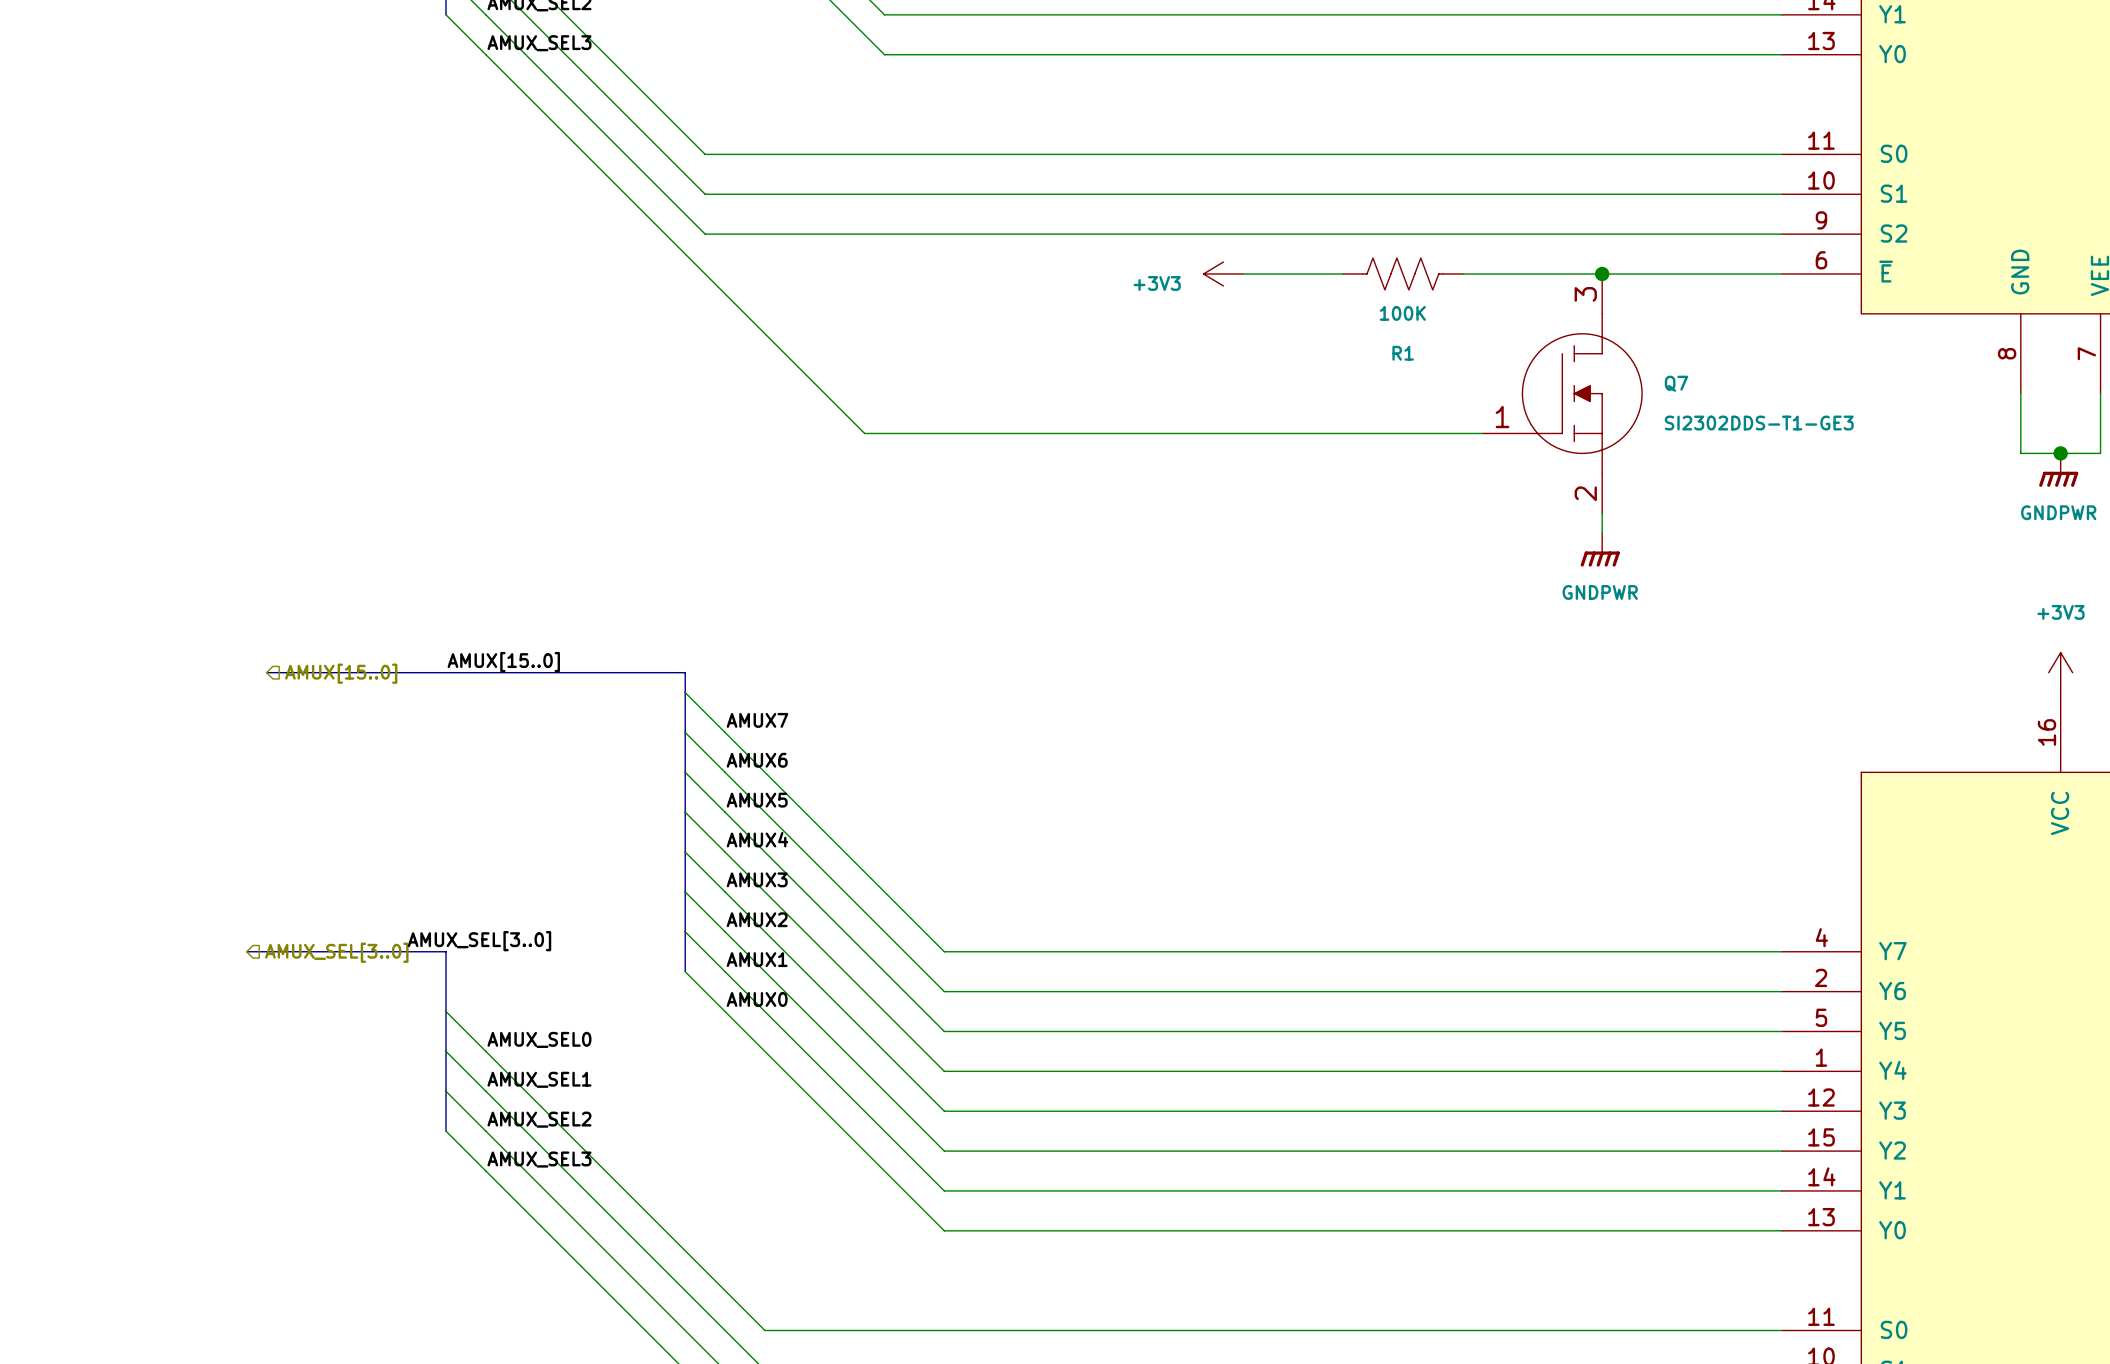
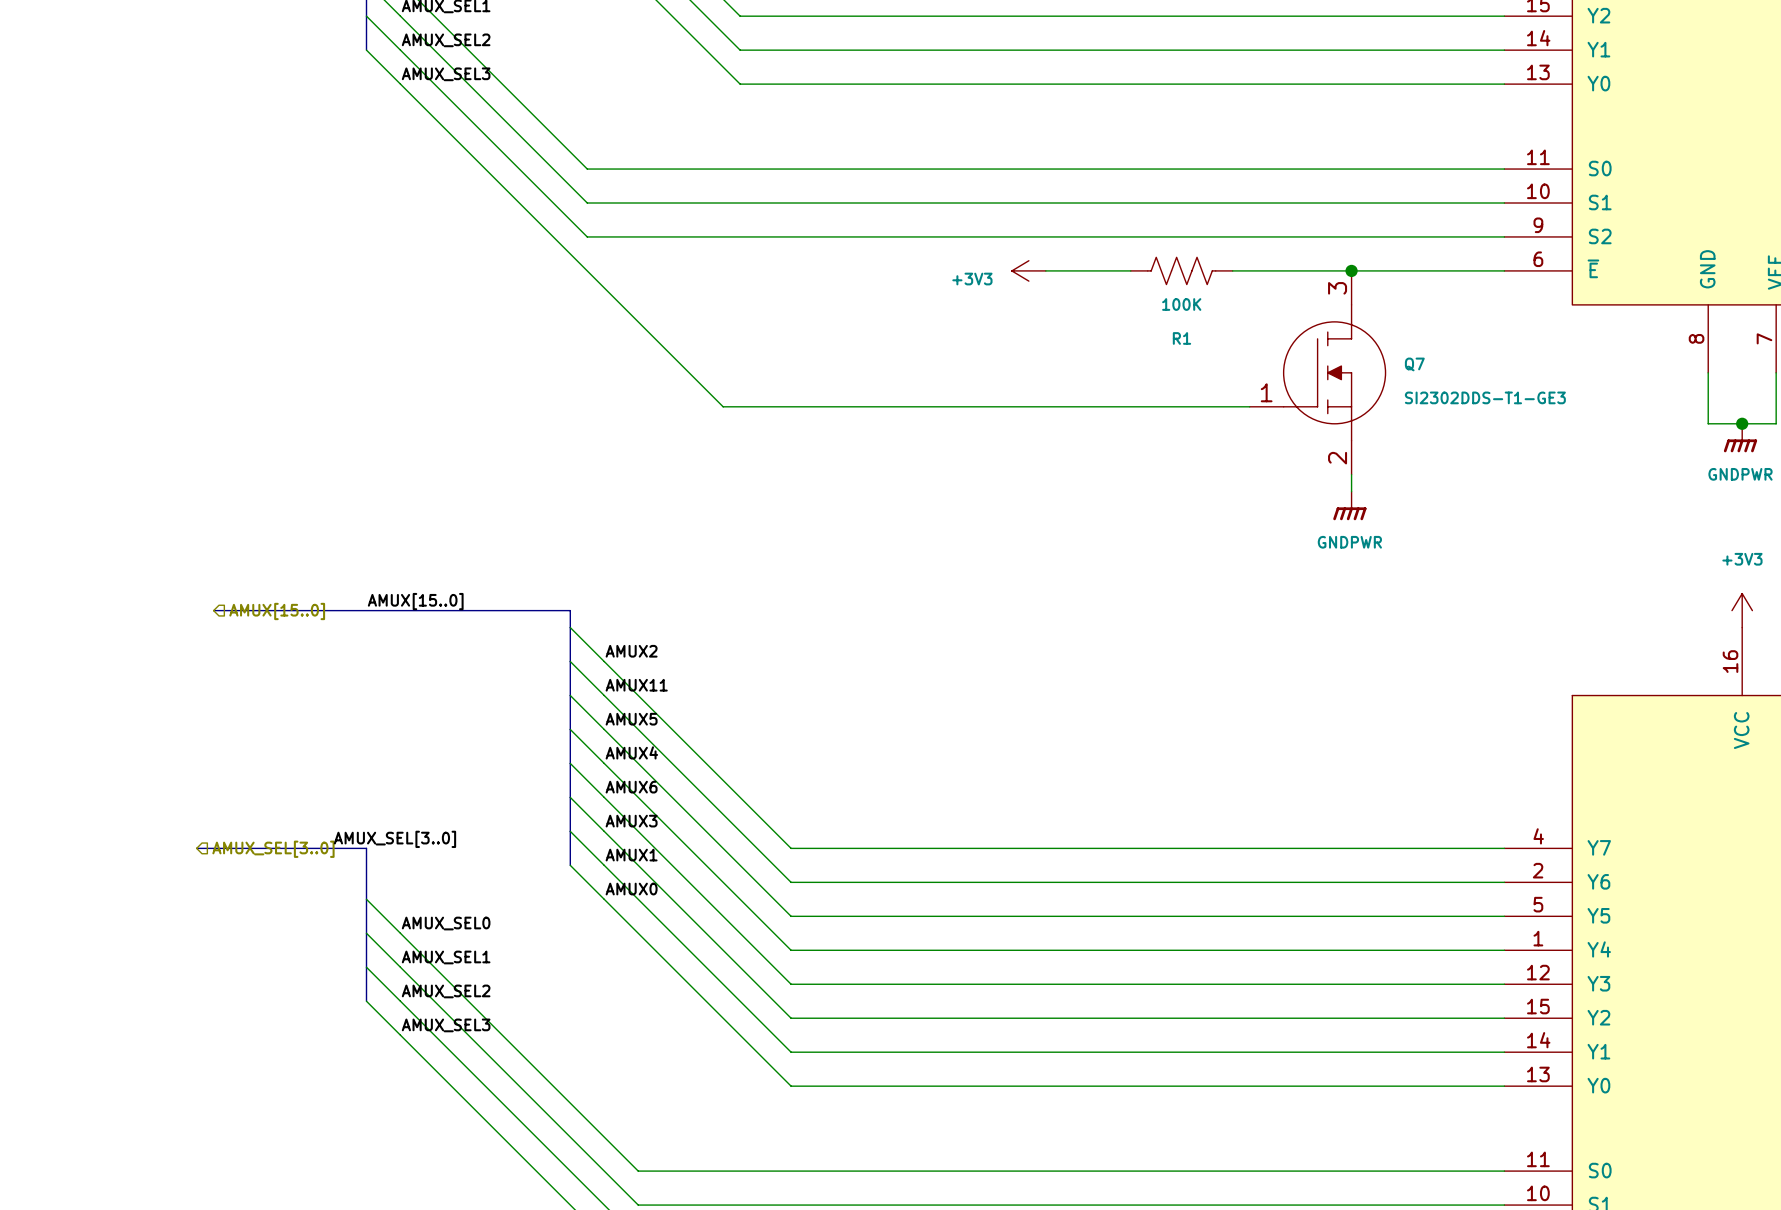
label: AMUX7 (757, 720) -> AMUX2 (631, 651)
label: AMUX6 (757, 760) -> AMUX11 (636, 685)
label: AMUX3 (757, 879) -> AMUX6 (631, 787)
label: AMUX2 (757, 919) -> AMUX3 (631, 821)

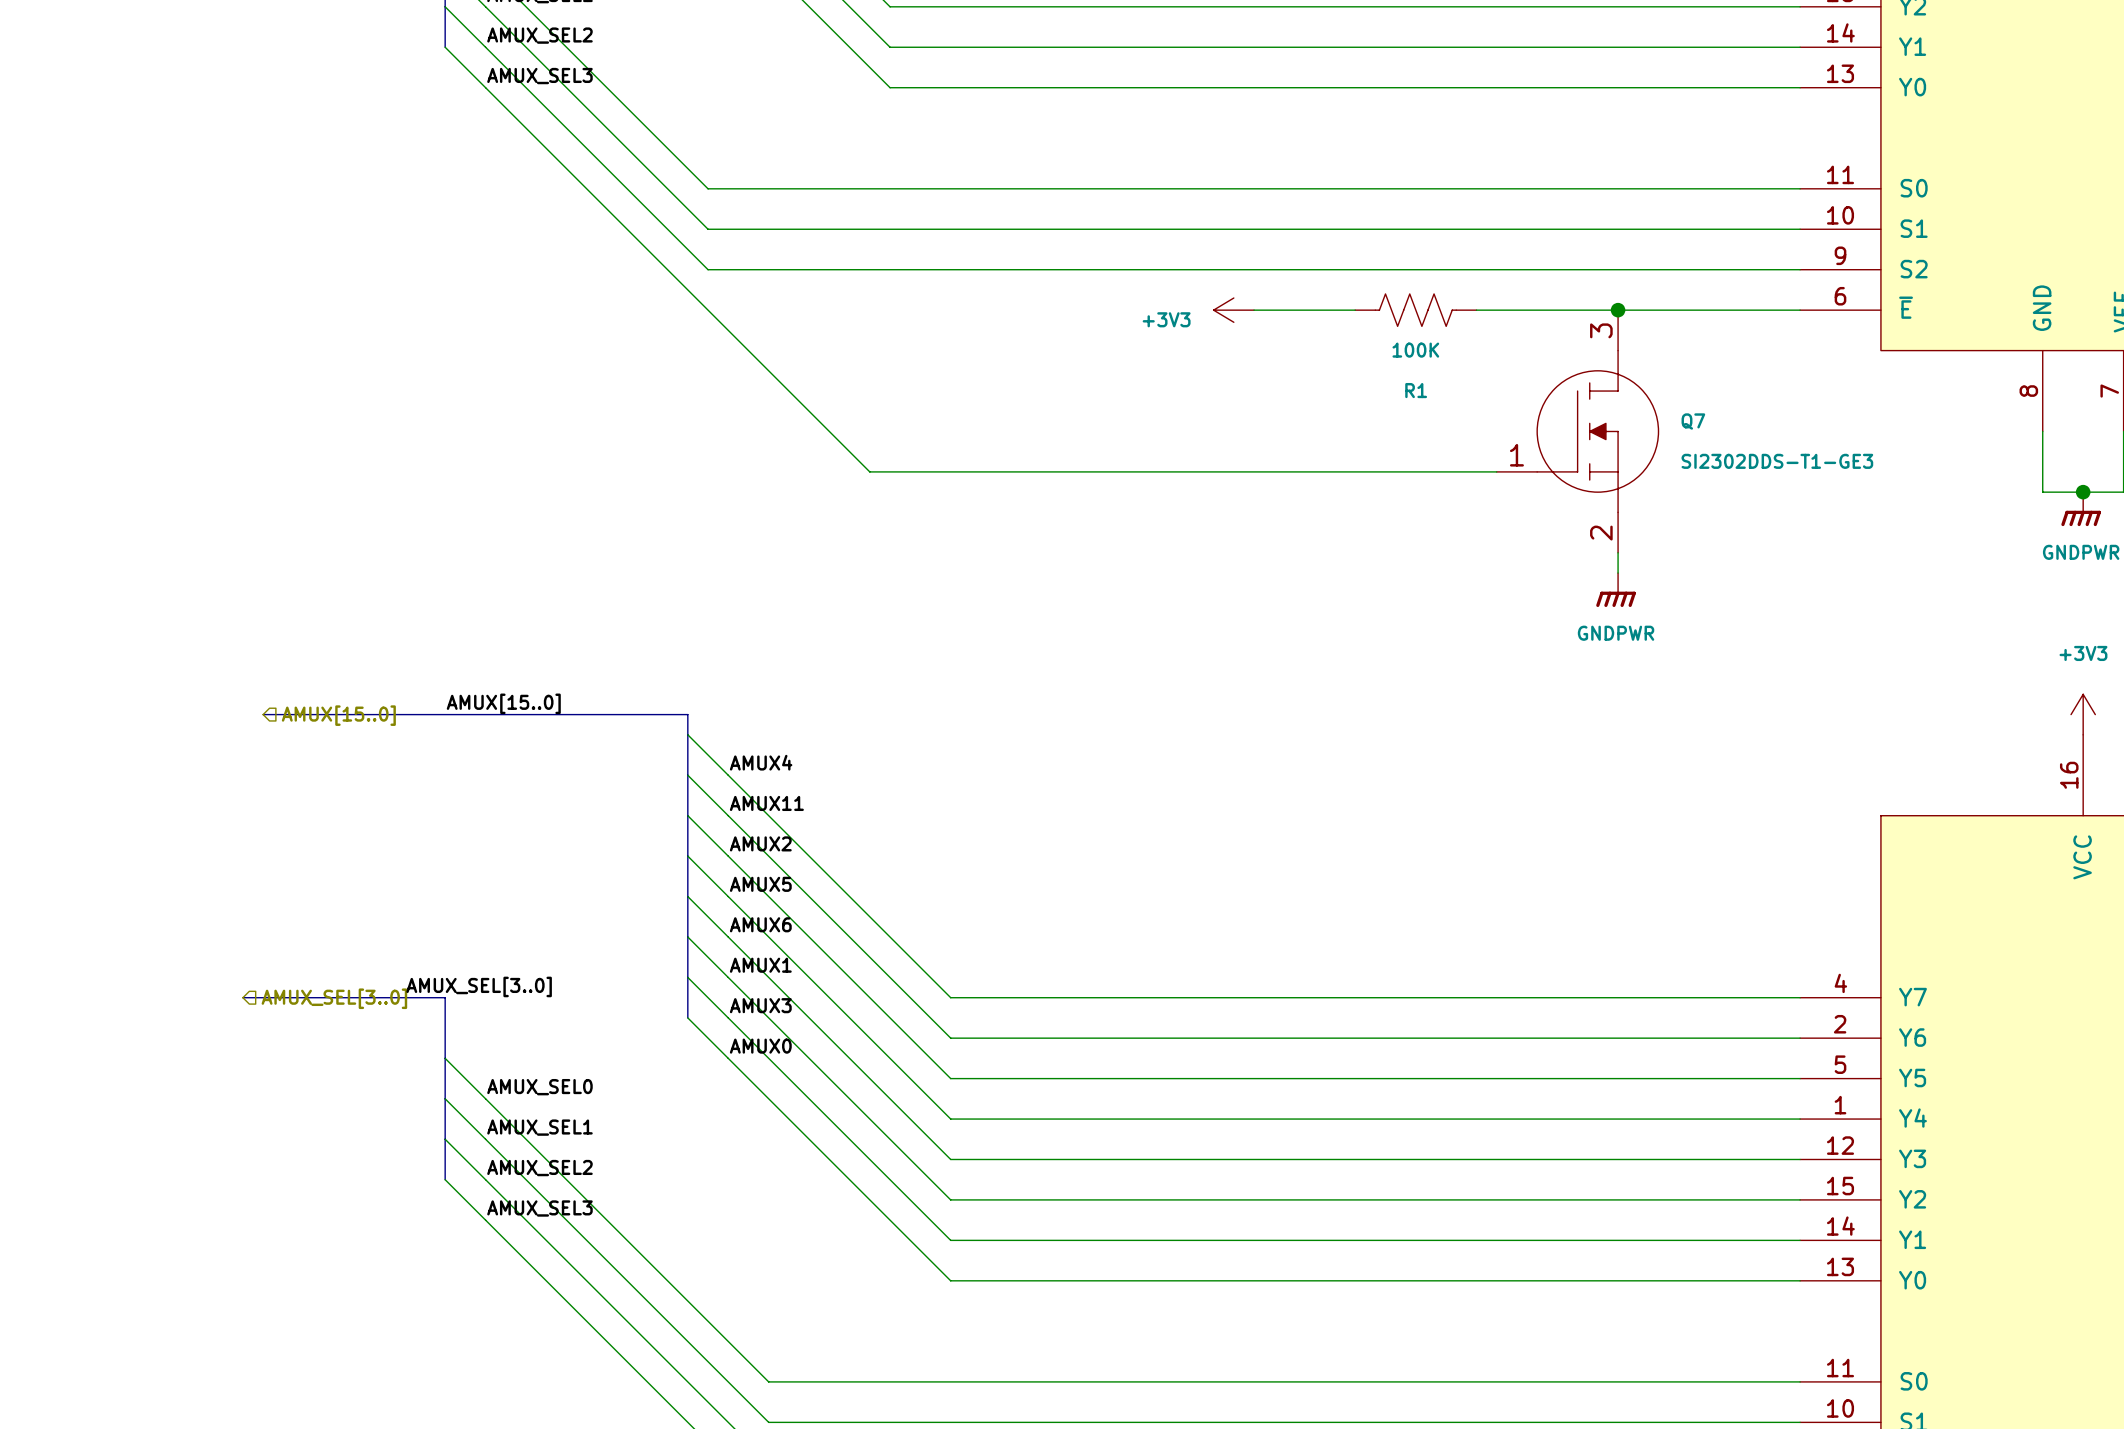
label: AMUX2 (631, 651) -> AMUX4 (761, 762)
label: AMUX5 (631, 719) -> AMUX2 (760, 843)
label: AMUX4 (631, 752) -> AMUX5 (760, 884)
label: AMUX3 (631, 821) -> AMUX1 (760, 965)
label: AMUX1 (631, 855) -> AMUX3 (760, 1005)

